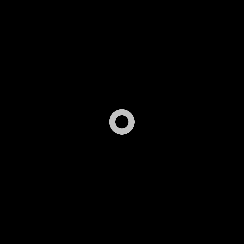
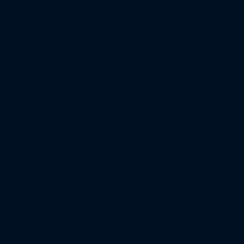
via: (121, 121) -> none

